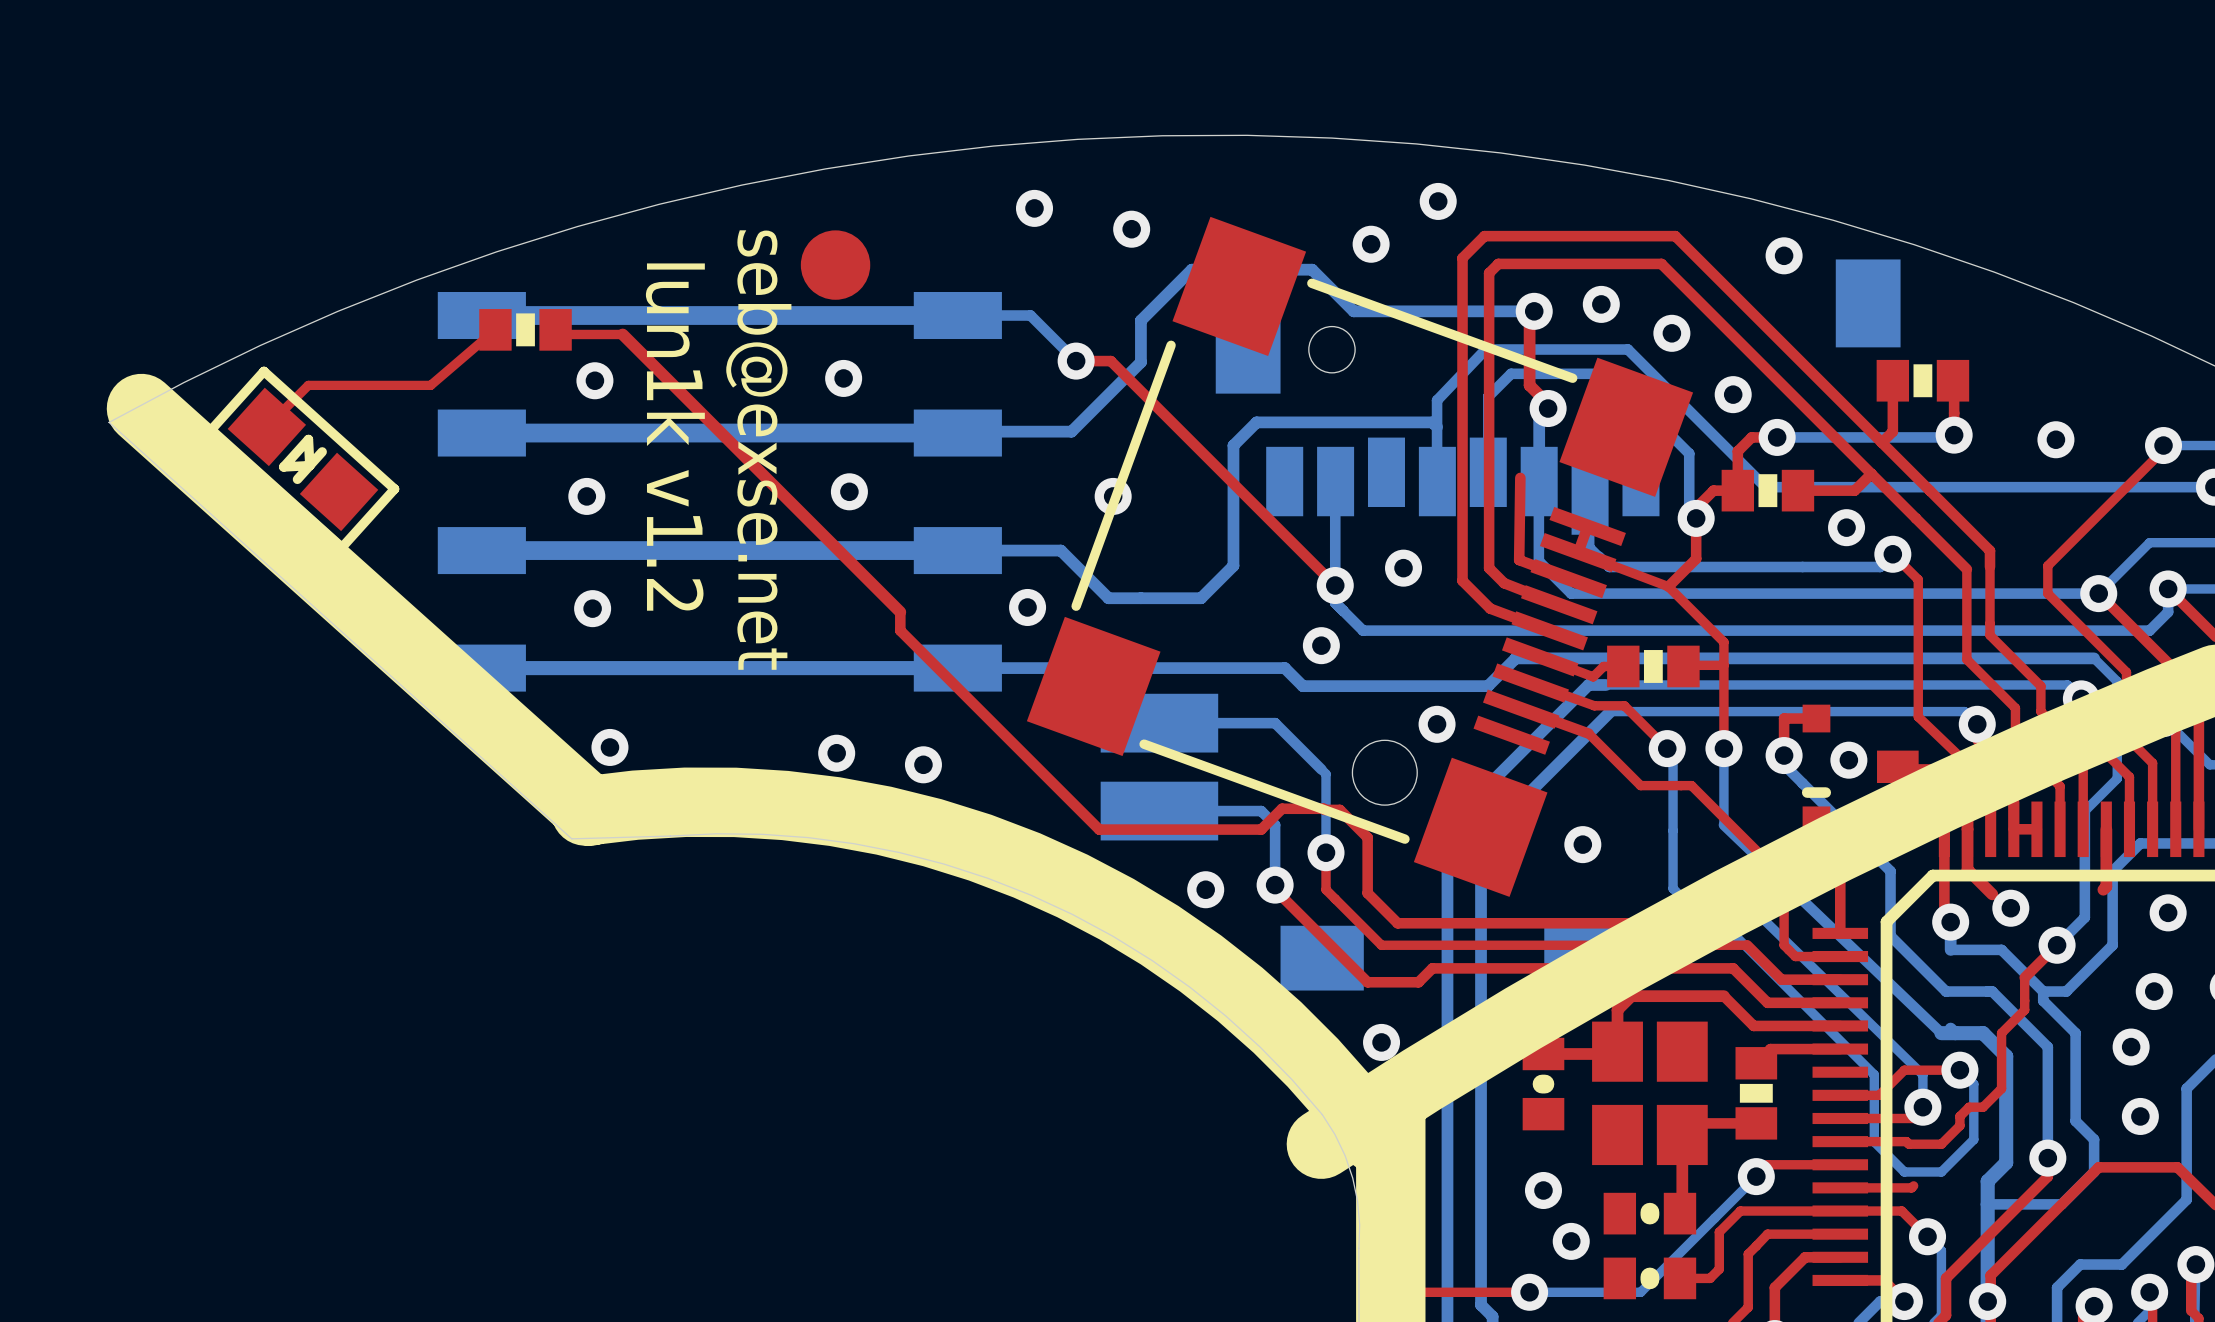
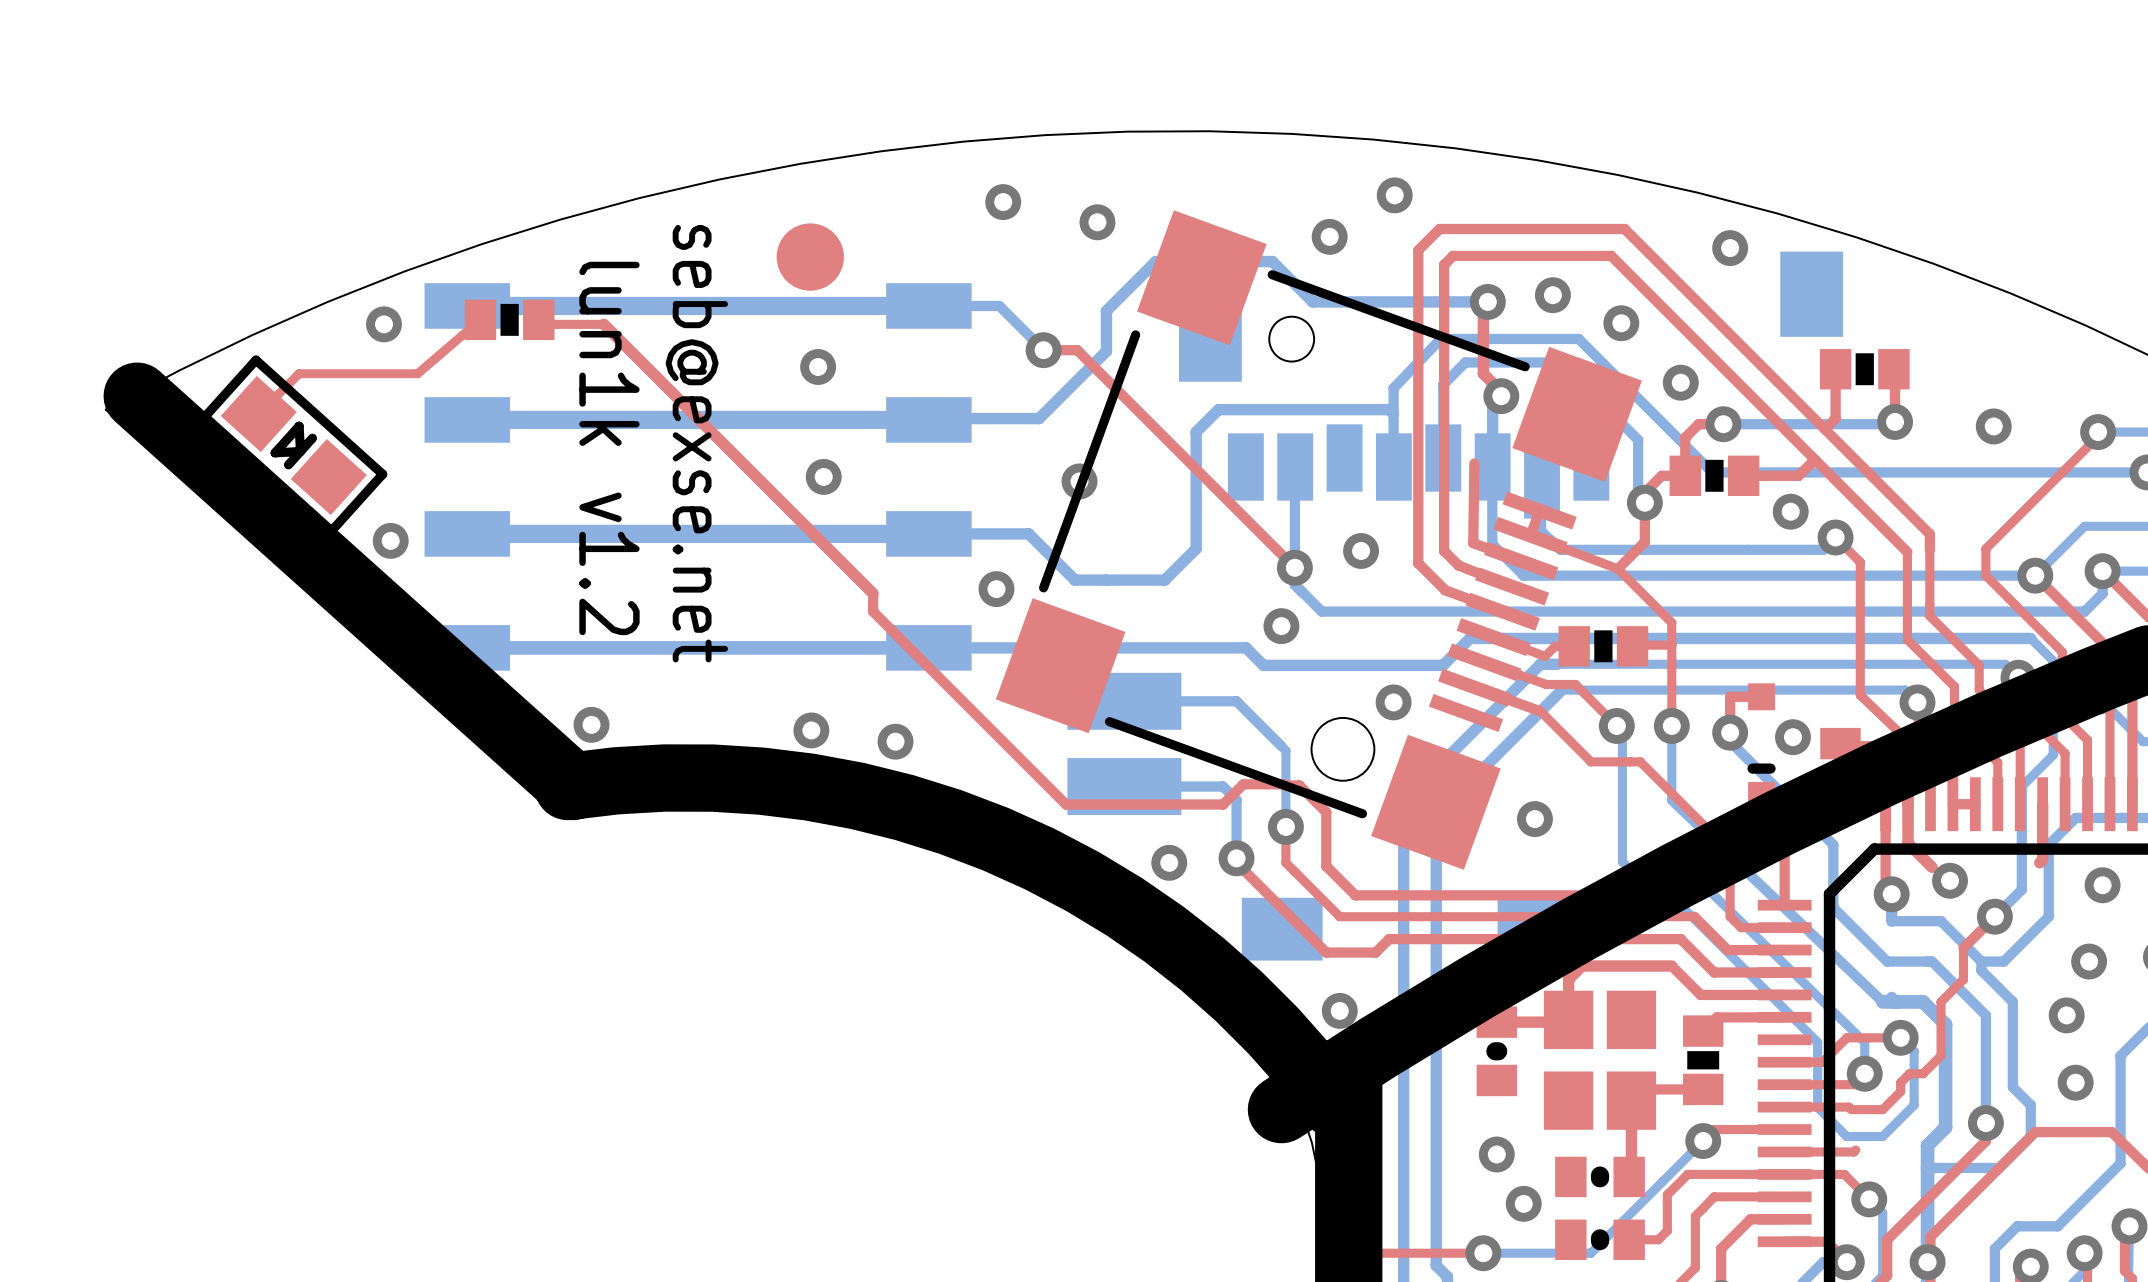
via: none -> (383, 324)
via: (594, 380) -> none
text position: lun1k v1.2 (675, 437) -> lun1k v1.2 (609, 448)
text position: seb@exse.net (758, 450) -> seb@exse.net (696, 443)
via: (586, 496) -> none
via: none -> (390, 540)
via: (592, 608) -> none

